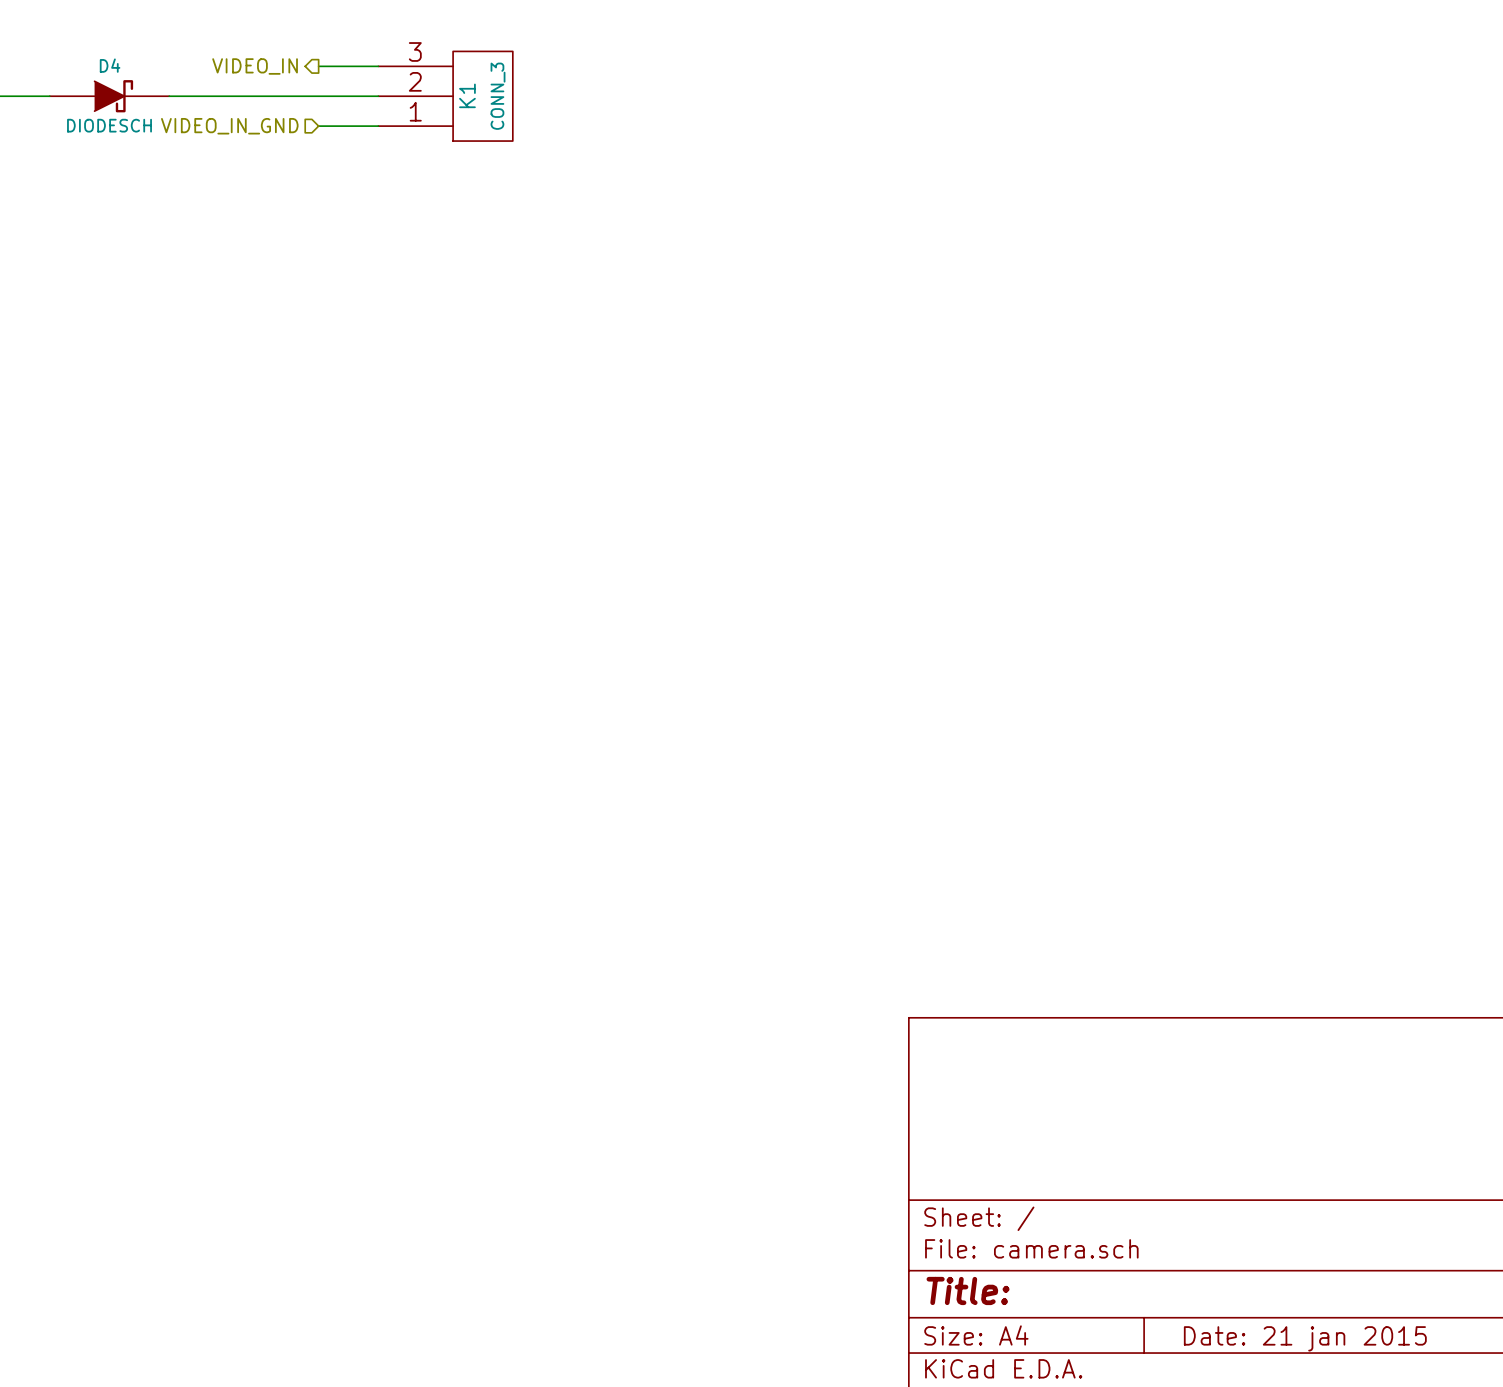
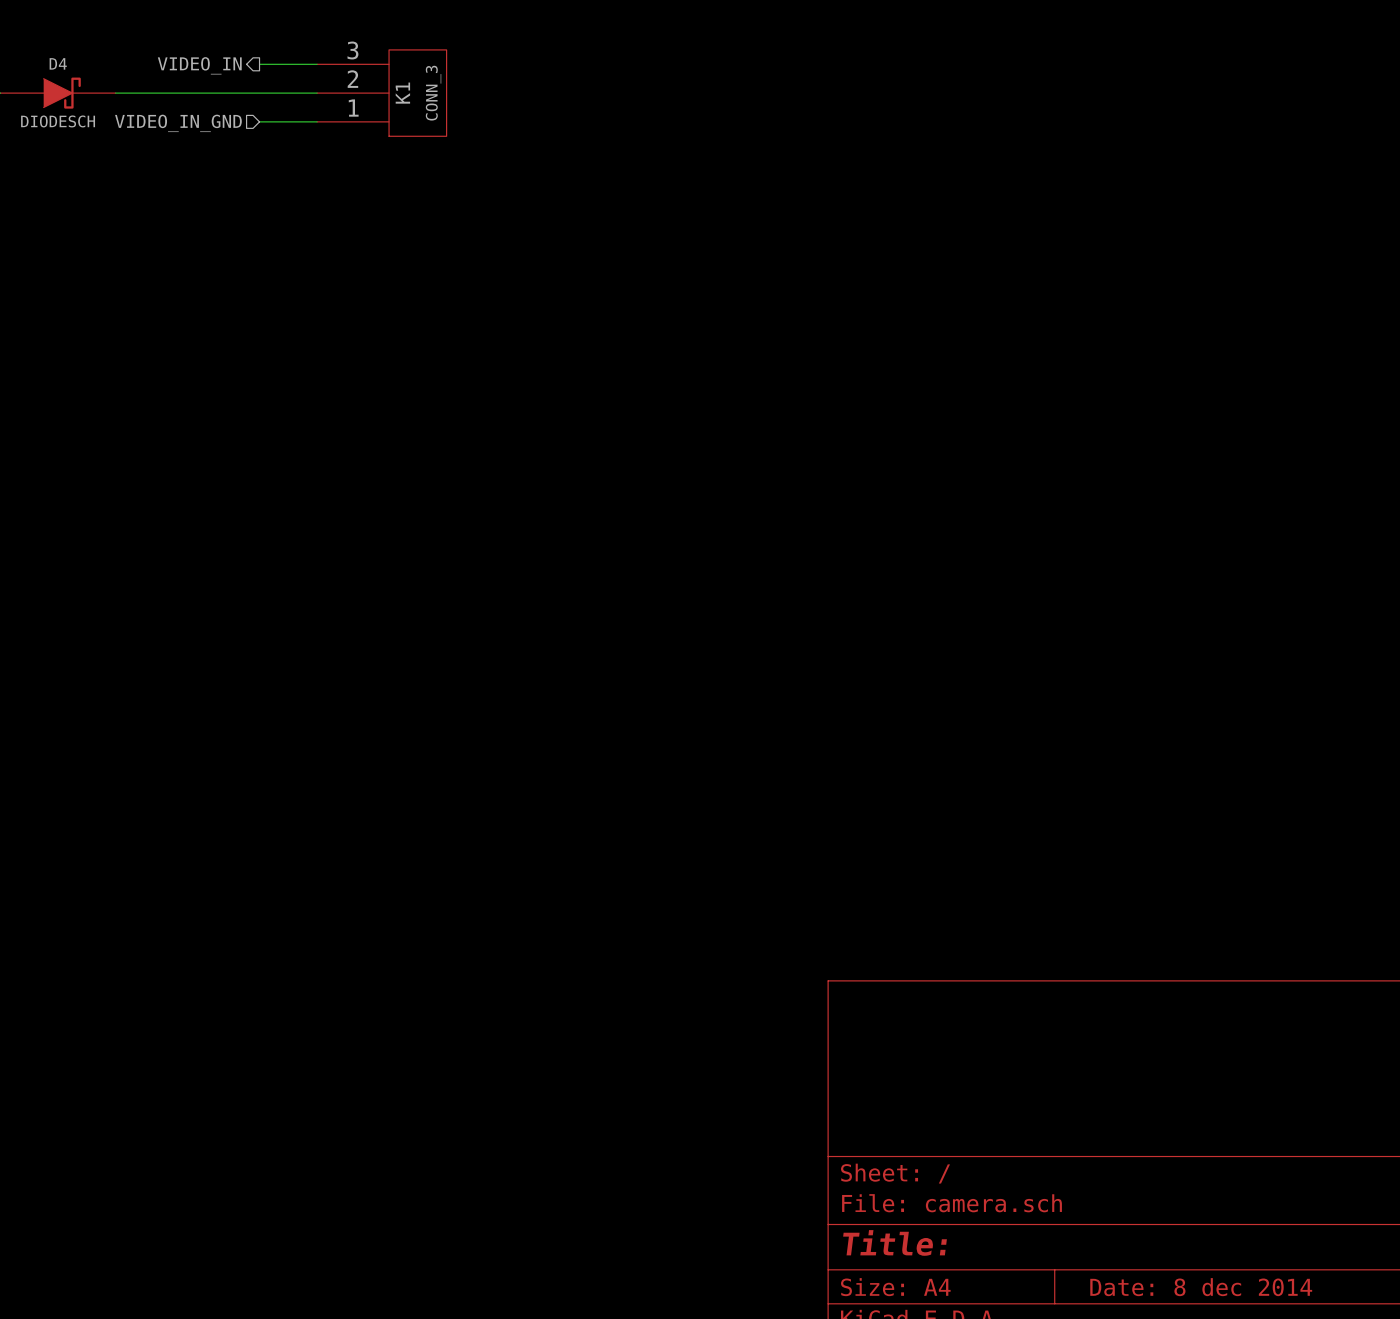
title block: Date: 21 jan 2015 (1305, 1338) -> Date: 8 dec 2014 (1201, 1287)

